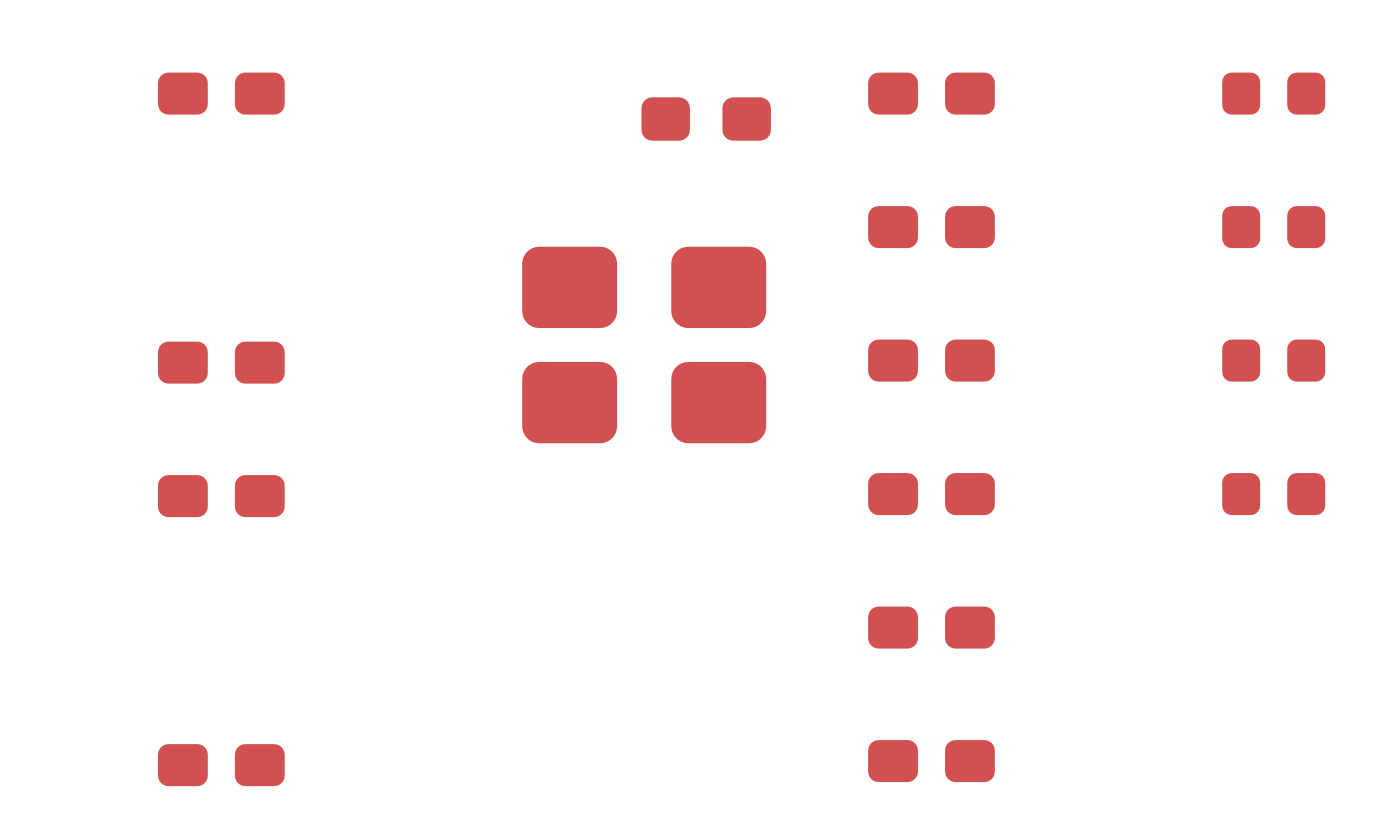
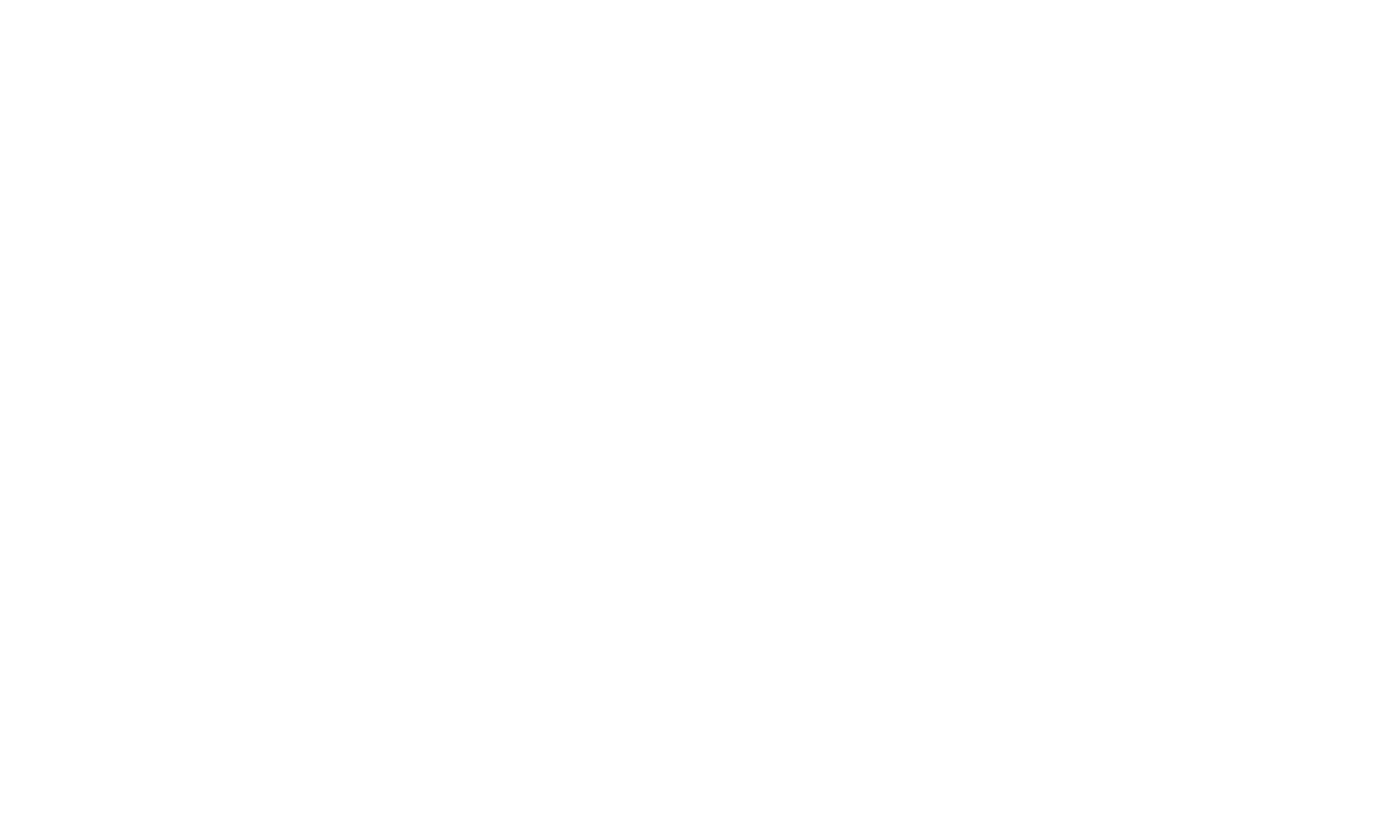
part: (221, 93) -> none
part: (931, 93) -> none
part: (1273, 93) -> none
part: (706, 119) -> none
part: (931, 227) -> none
part: (1273, 227) -> none
part: (644, 345) -> none
part: (931, 360) -> none
part: (1273, 360) -> none
part: (221, 362) -> none
part: (931, 494) -> none
part: (1273, 494) -> none
part: (221, 496) -> none
part: (931, 627) -> none
part: (931, 761) -> none
part: (221, 765) -> none

